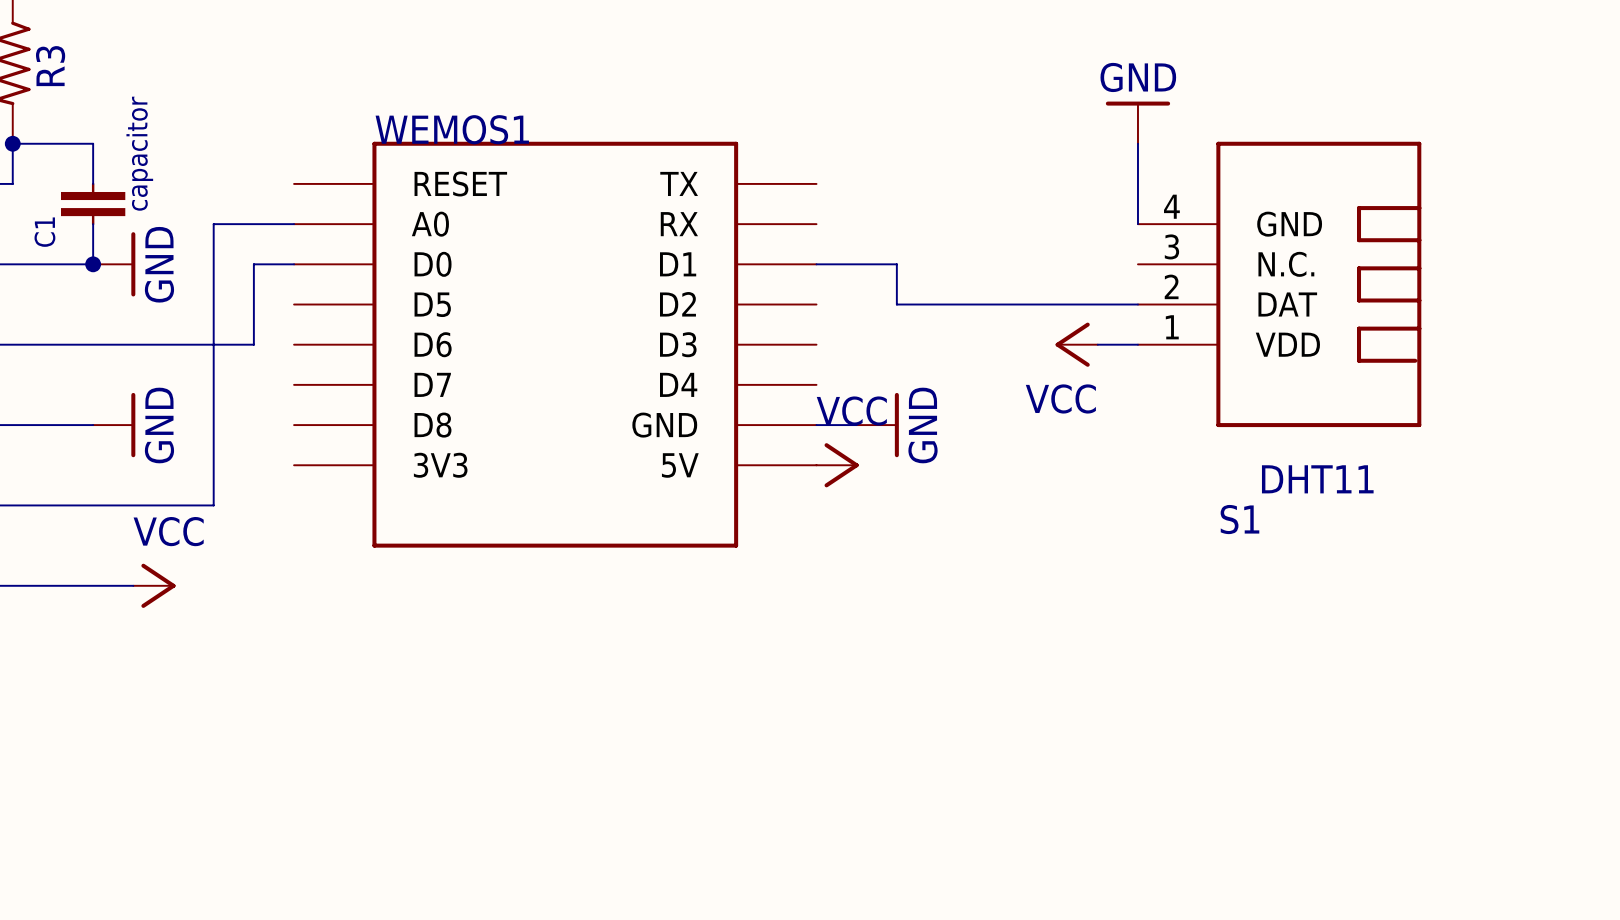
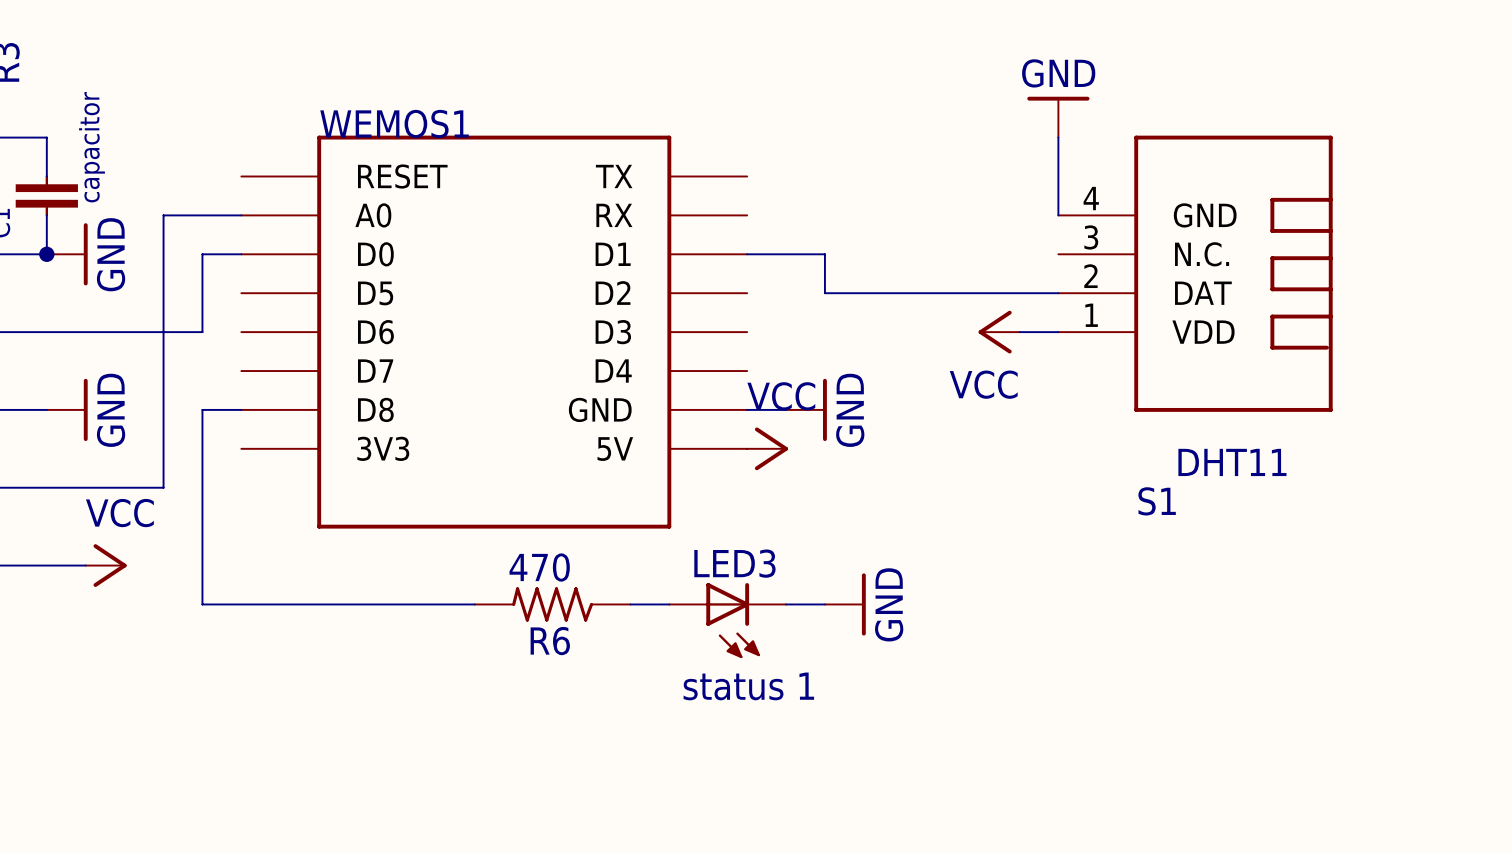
wire: none -> (241, 409) (202, 409) (202, 604) (474, 604)
R6: none -> 470 (552, 604)
wire: none -> (630, 604) (669, 604)
wire: none -> (786, 604) (824, 604)
power symbol: none -> GND (845, 604)
LED3: none -> status 1 (727, 620)

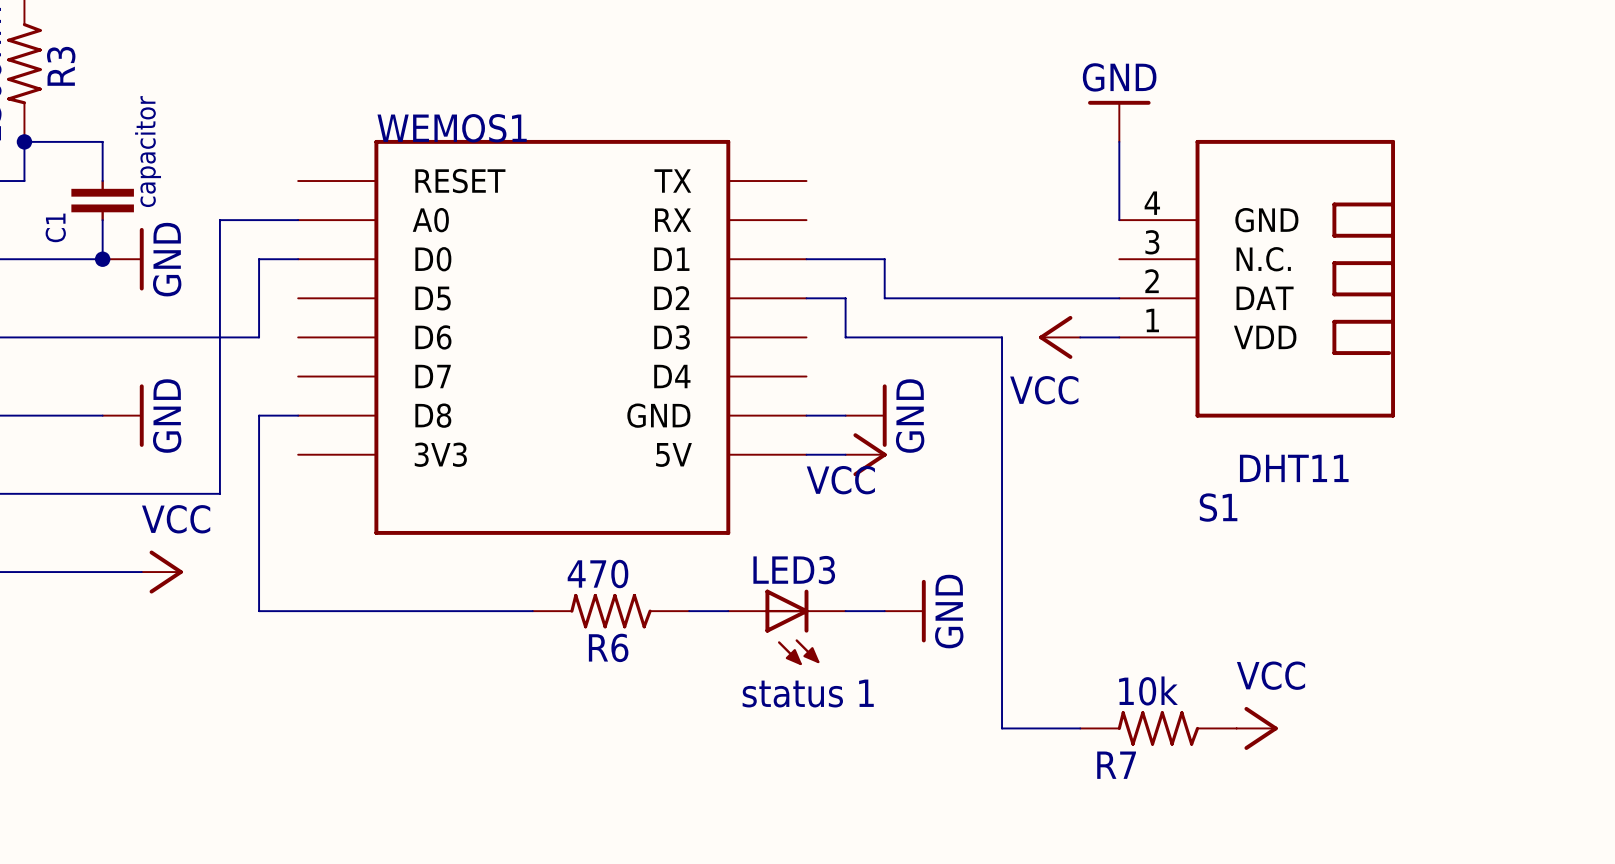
wire: none -> (806, 298) (845, 298) (845, 337) (1002, 337) (1002, 728) (1080, 728)
power symbol text position: VCC (781, 396) -> VCC (840, 480)
power symbol position: VCC (767, 448) -> VCC (866, 454)
R7: none -> 10k (1158, 728)
power symbol: none -> VCC (1257, 728)

